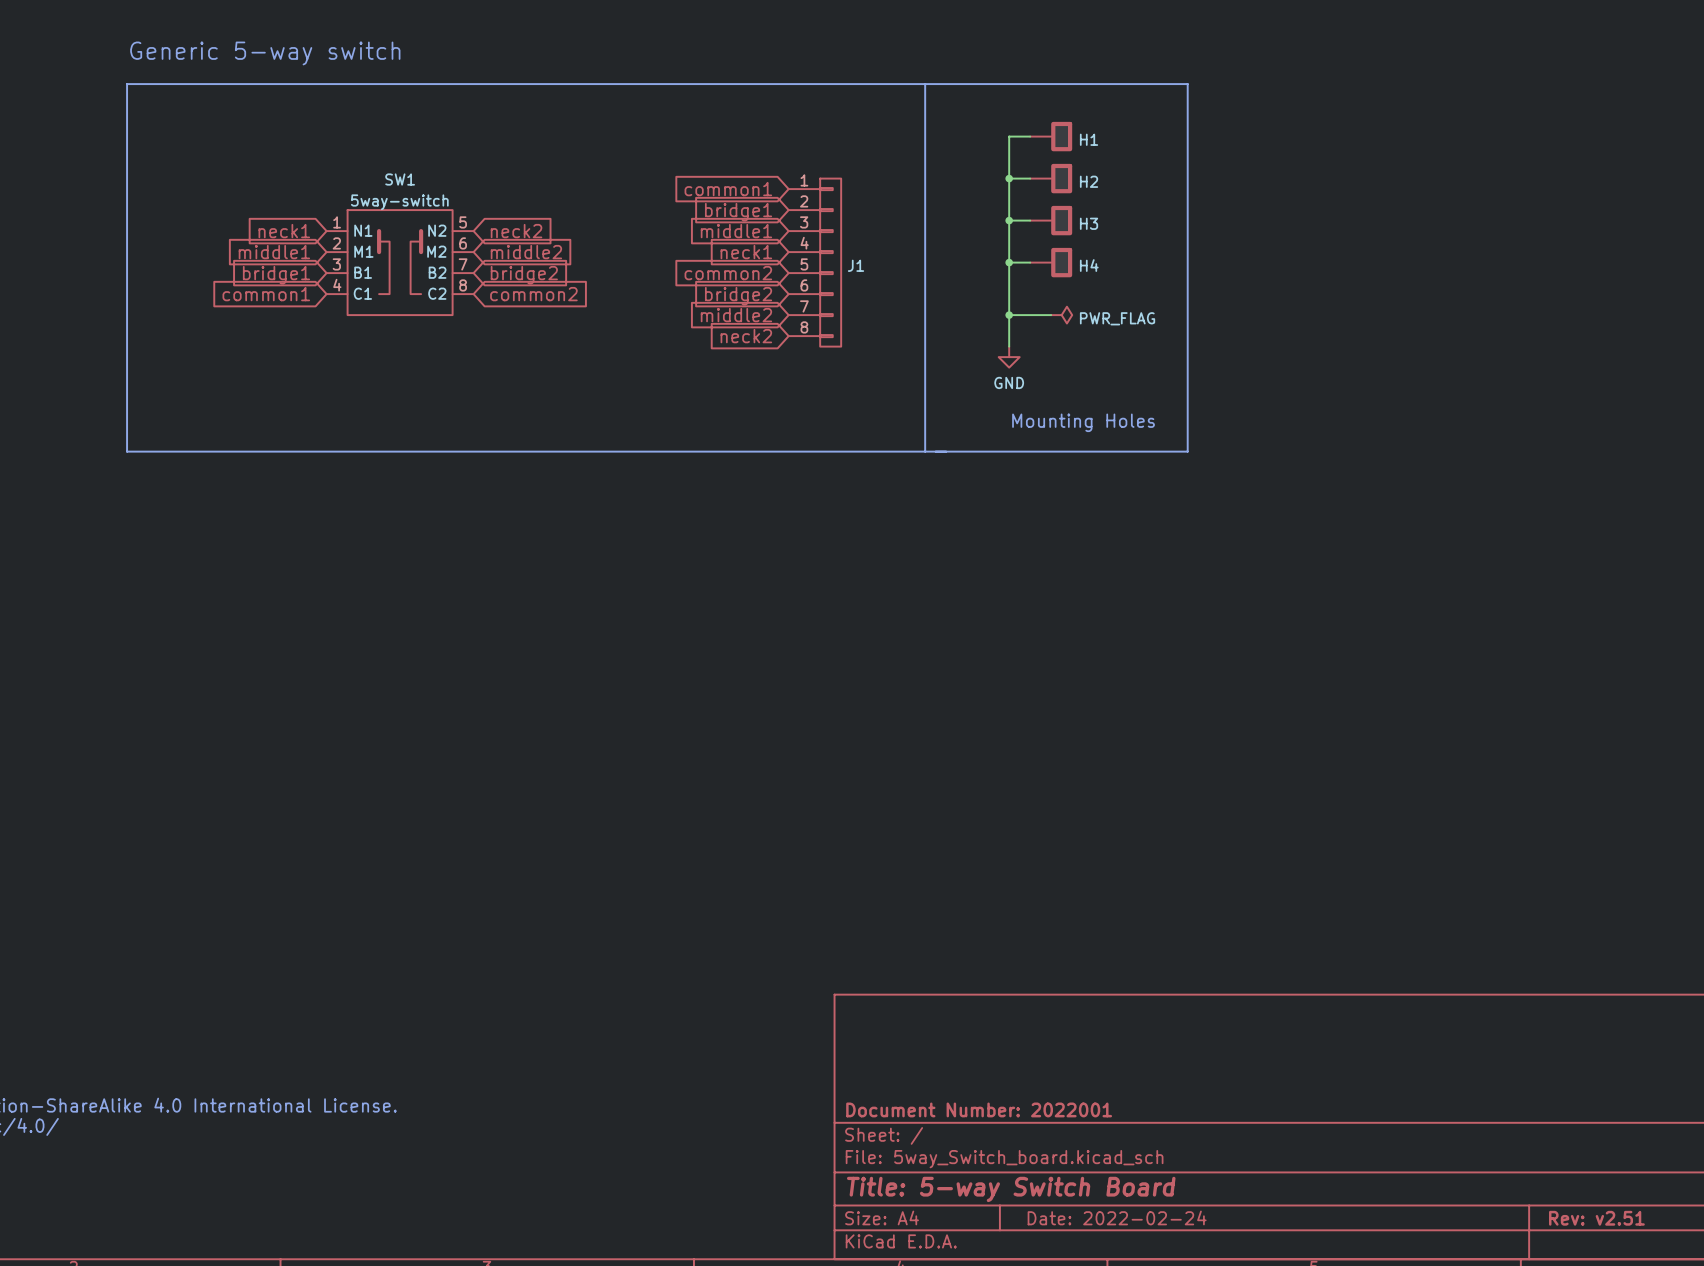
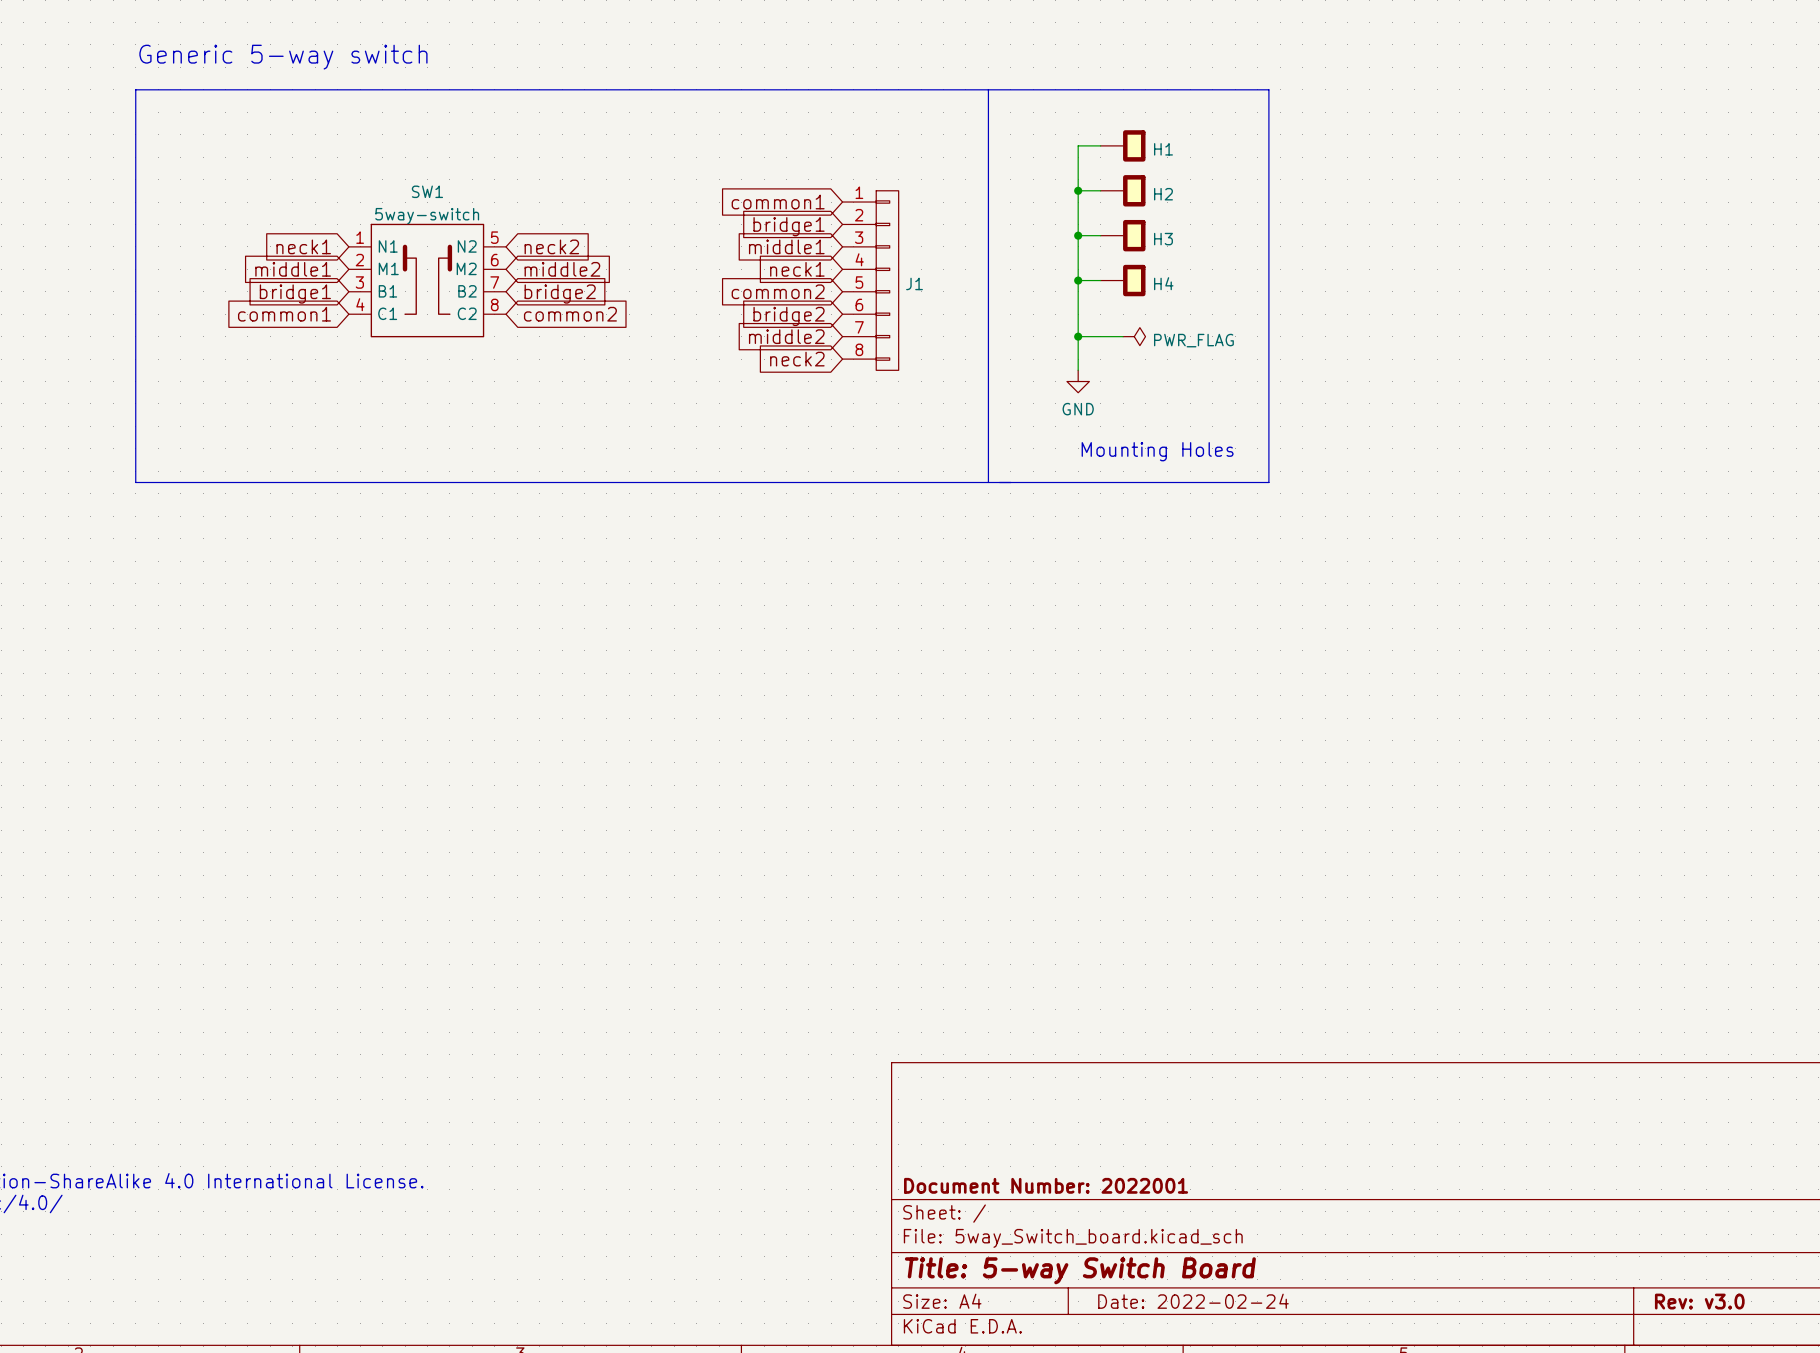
title block: Rev: v2.51 (1596, 1218) -> Rev: v3.0 (1699, 1301)

